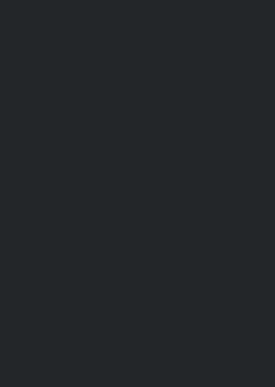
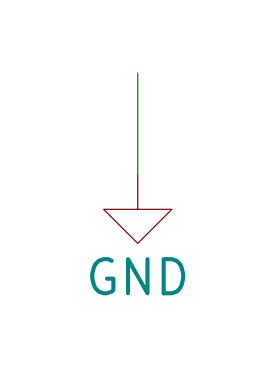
wire: none -> (137, 72) (137, 175)
power symbol: none -> GND (137, 209)

